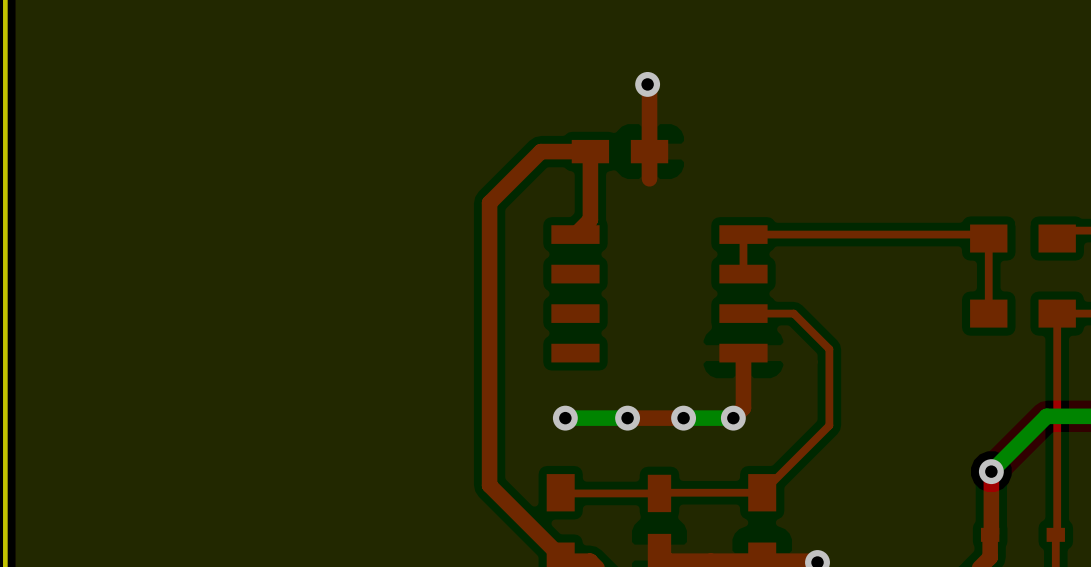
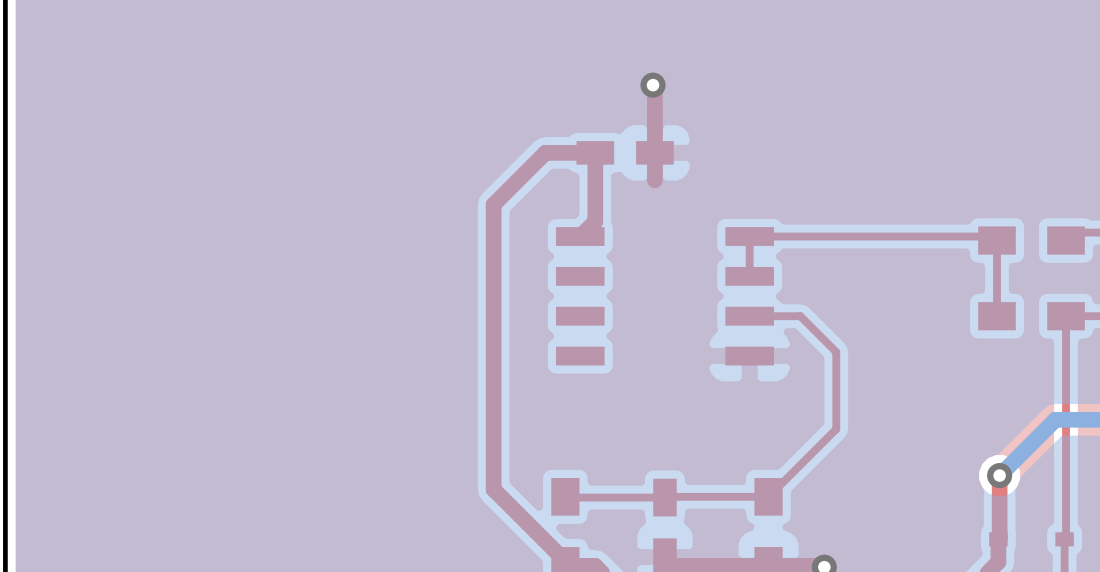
top track: (743, 353) (743, 408) (733, 418) -> none
via: (565, 418) -> none
bottom track: (627, 418) (565, 418) -> none
via: (627, 418) -> none
top track: (683, 418) (627, 418) -> none
via: (683, 418) -> none
bottom track: (733, 418) (683, 418) -> none
via: (733, 418) -> none

